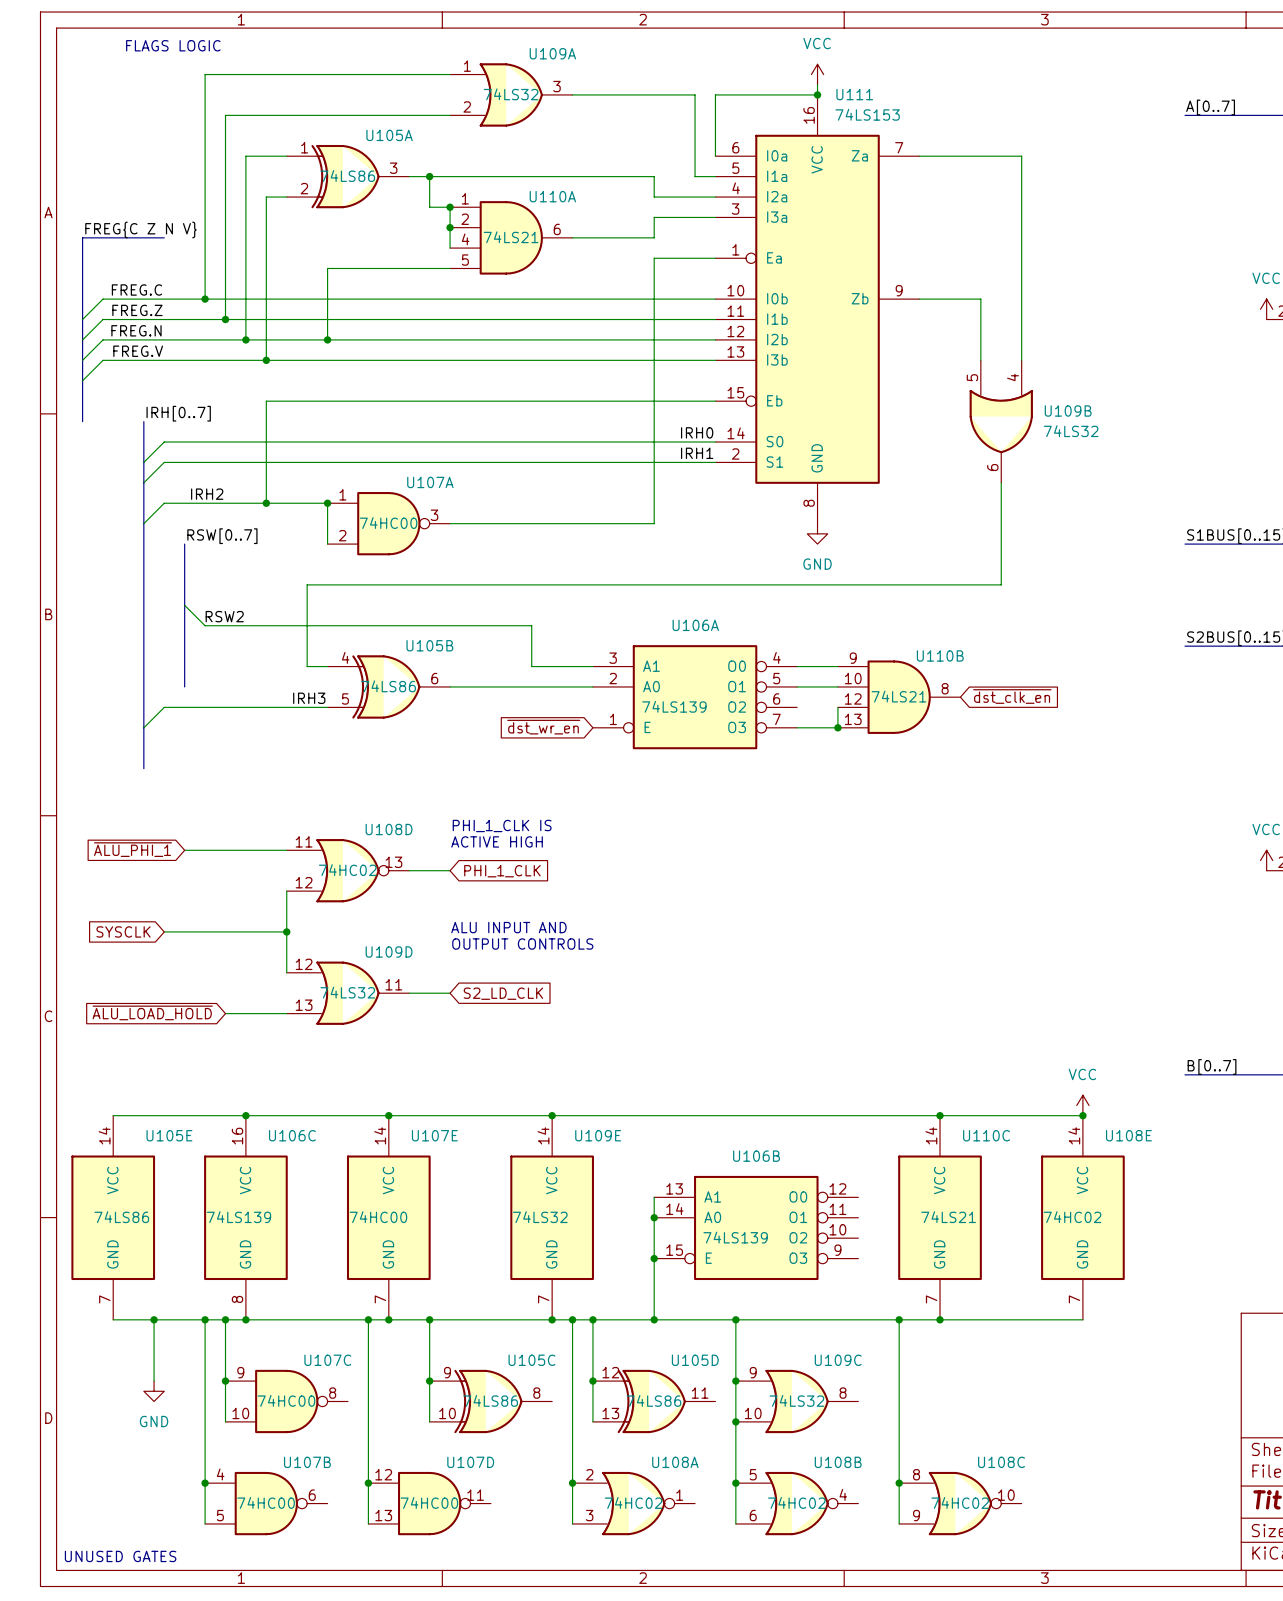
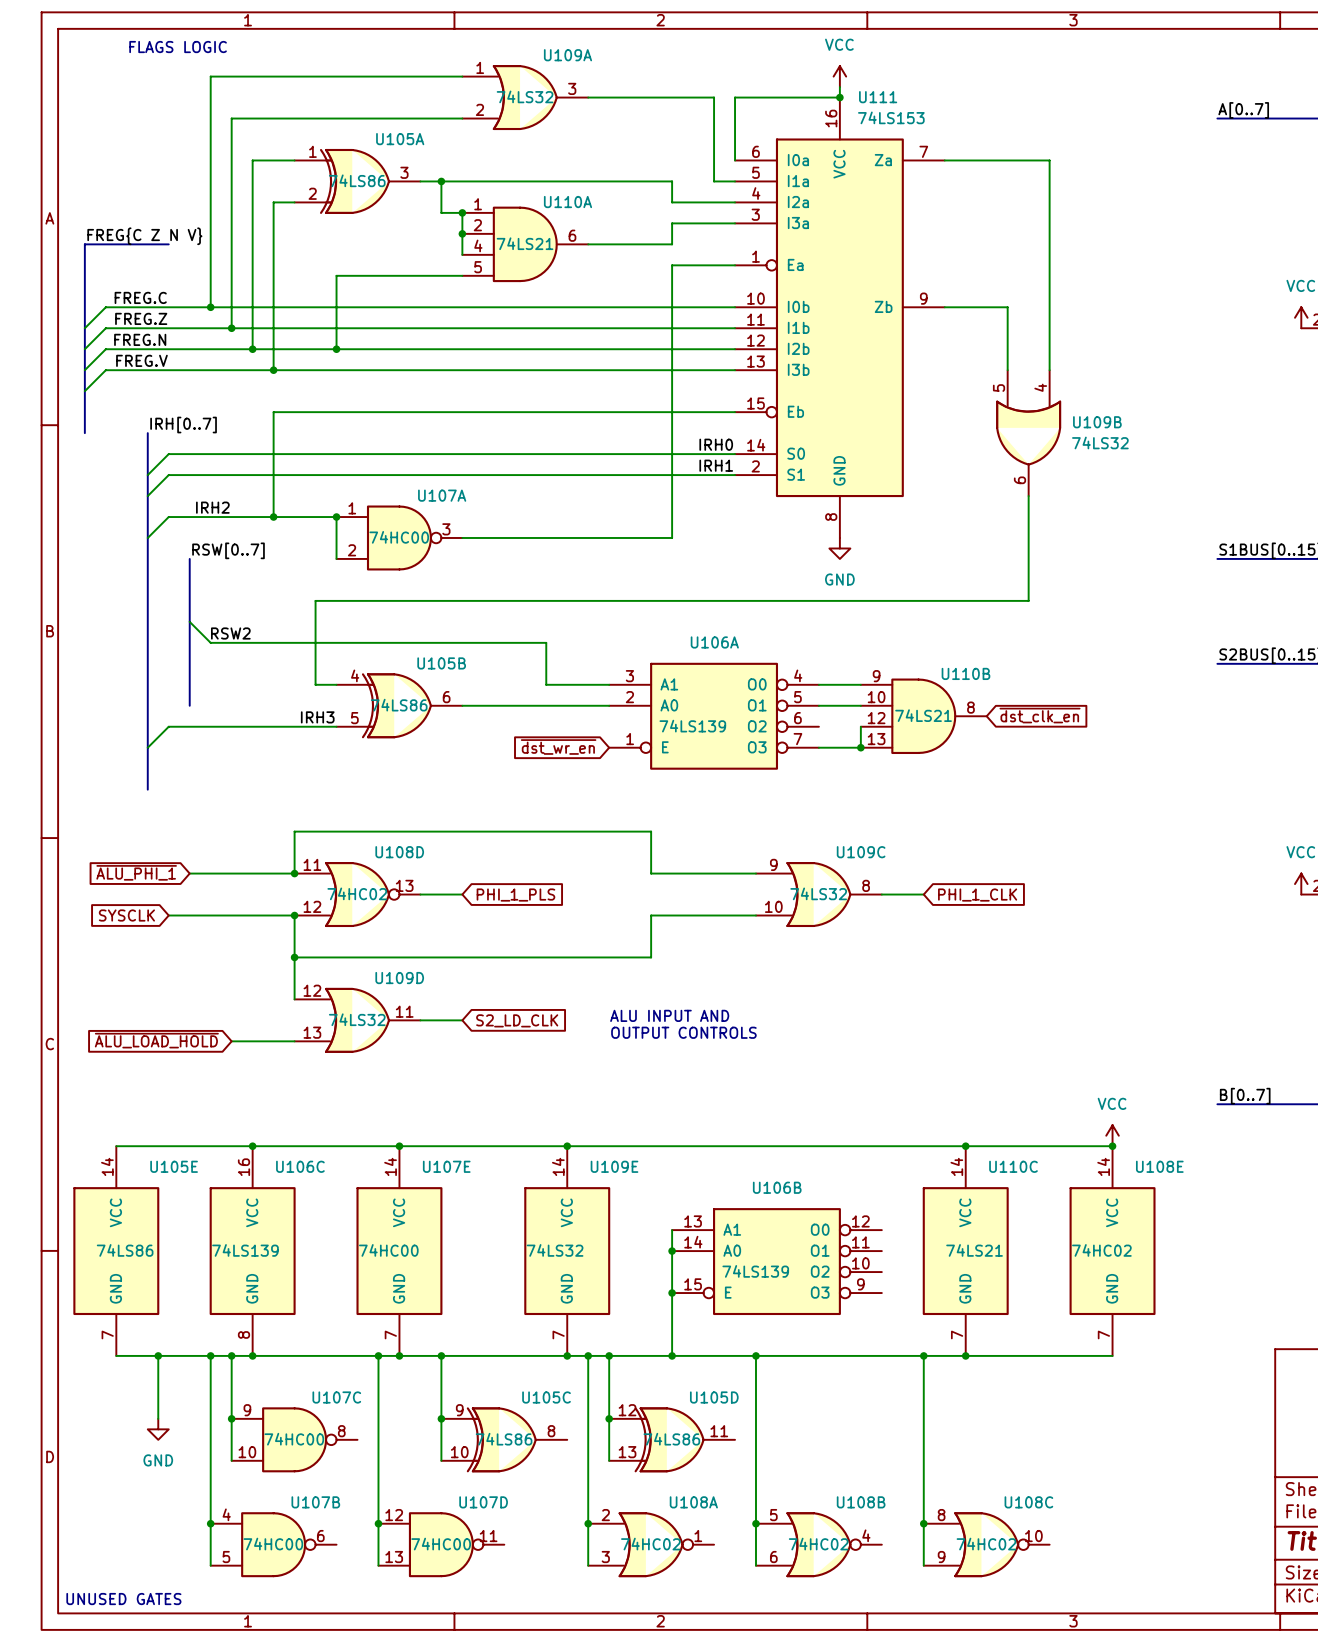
text: PHI_1_CLK IS (502, 825) -> none
text: ACTIVE HIGH (497, 841) -> none
wire: none -> (294, 873) (294, 831) (651, 831) (651, 873) (756, 873)
junction: none -> (294, 873)
wire: none -> (881, 894) (923, 894)
global label: PHI_1_CLK (502, 871) -> PHI_1_PLS (515, 895)
global label: none -> PHI_1_CLK (977, 895)
wire: none -> (168, 915) (294, 915)
junction: none -> (294, 915)
text position: ALU INPUT AND (508, 927) -> ALU INPUT AND (669, 1015)
global label position: SYSCLK (123, 931) -> SYSCLK (126, 915)
wire: (164, 931) (286, 931) -> (756, 915) (651, 915) (651, 957) (294, 957)
text position: OUTPUT CONTROLS (522, 944) -> OUTPUT CONTROLS (683, 1032)
junction: (735, 1381) -> none
U109C position: (797, 1401) -> (818, 894)
junction: (735, 1421) -> none

